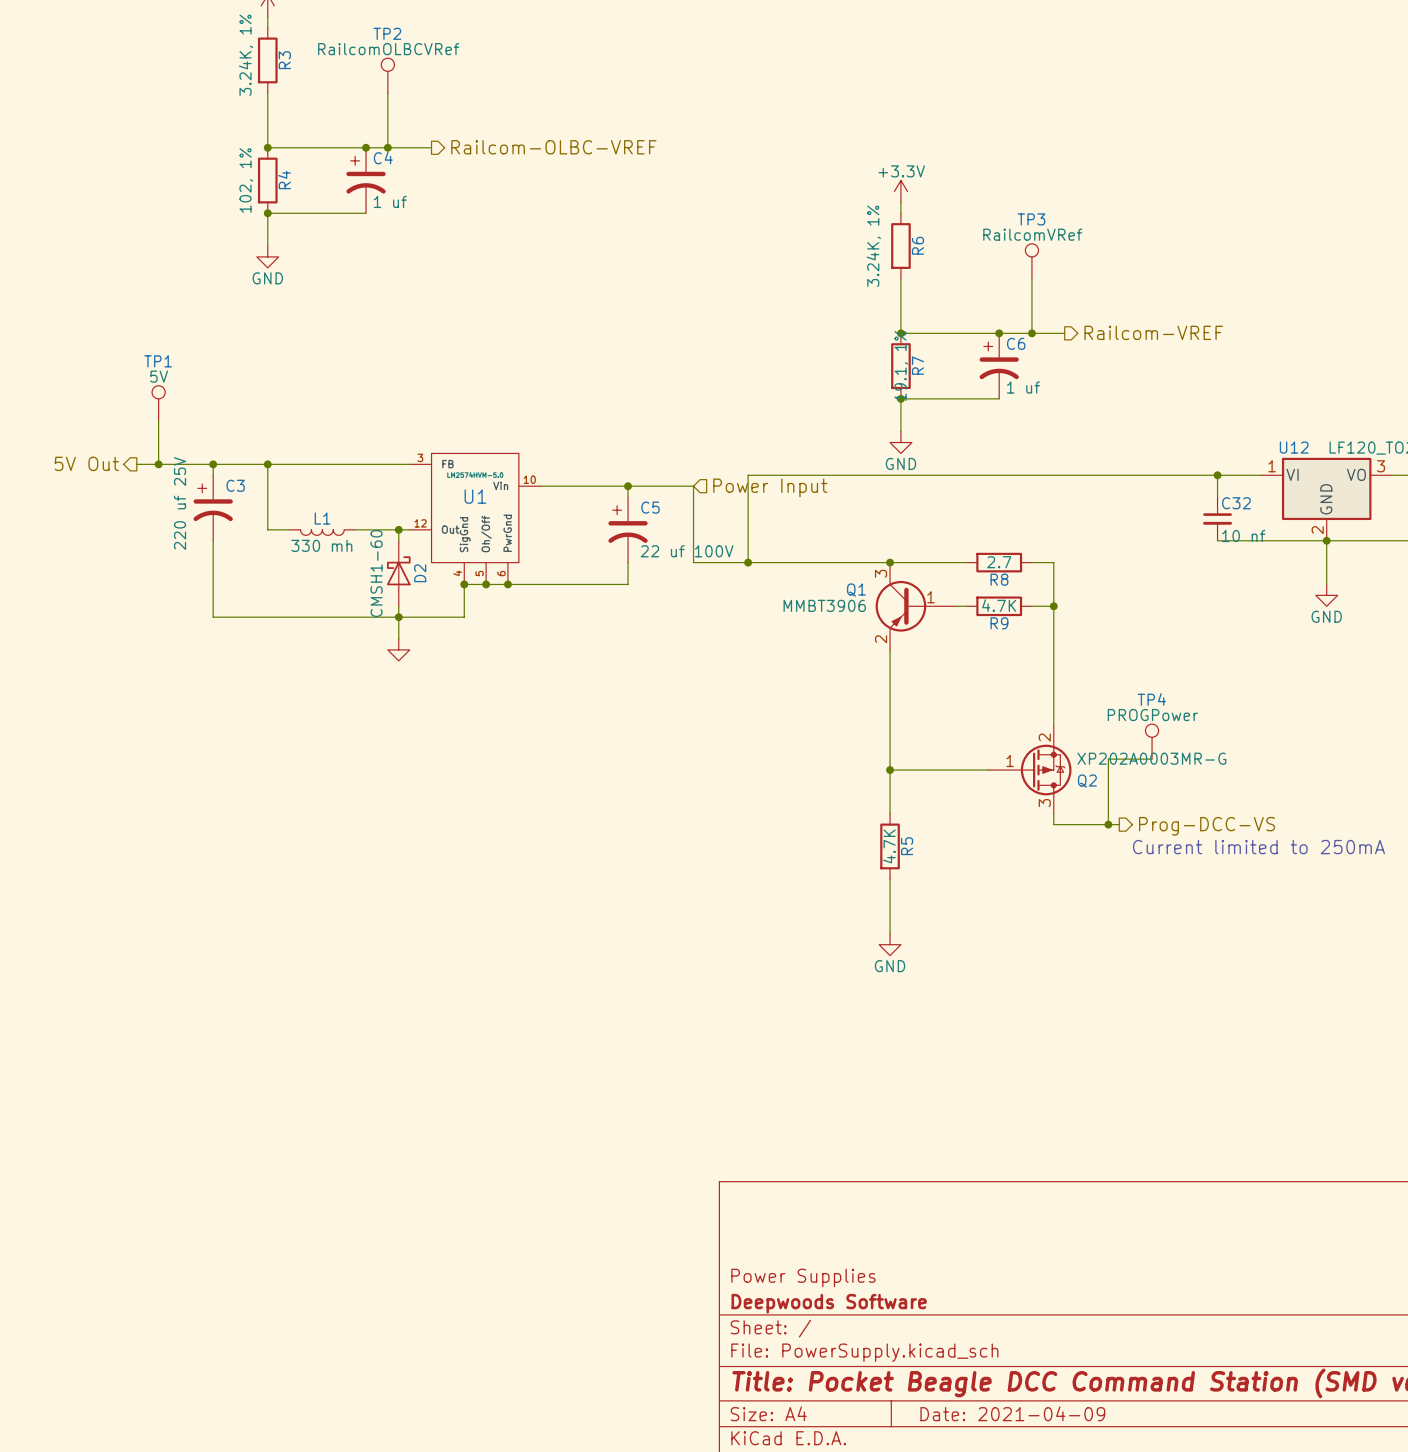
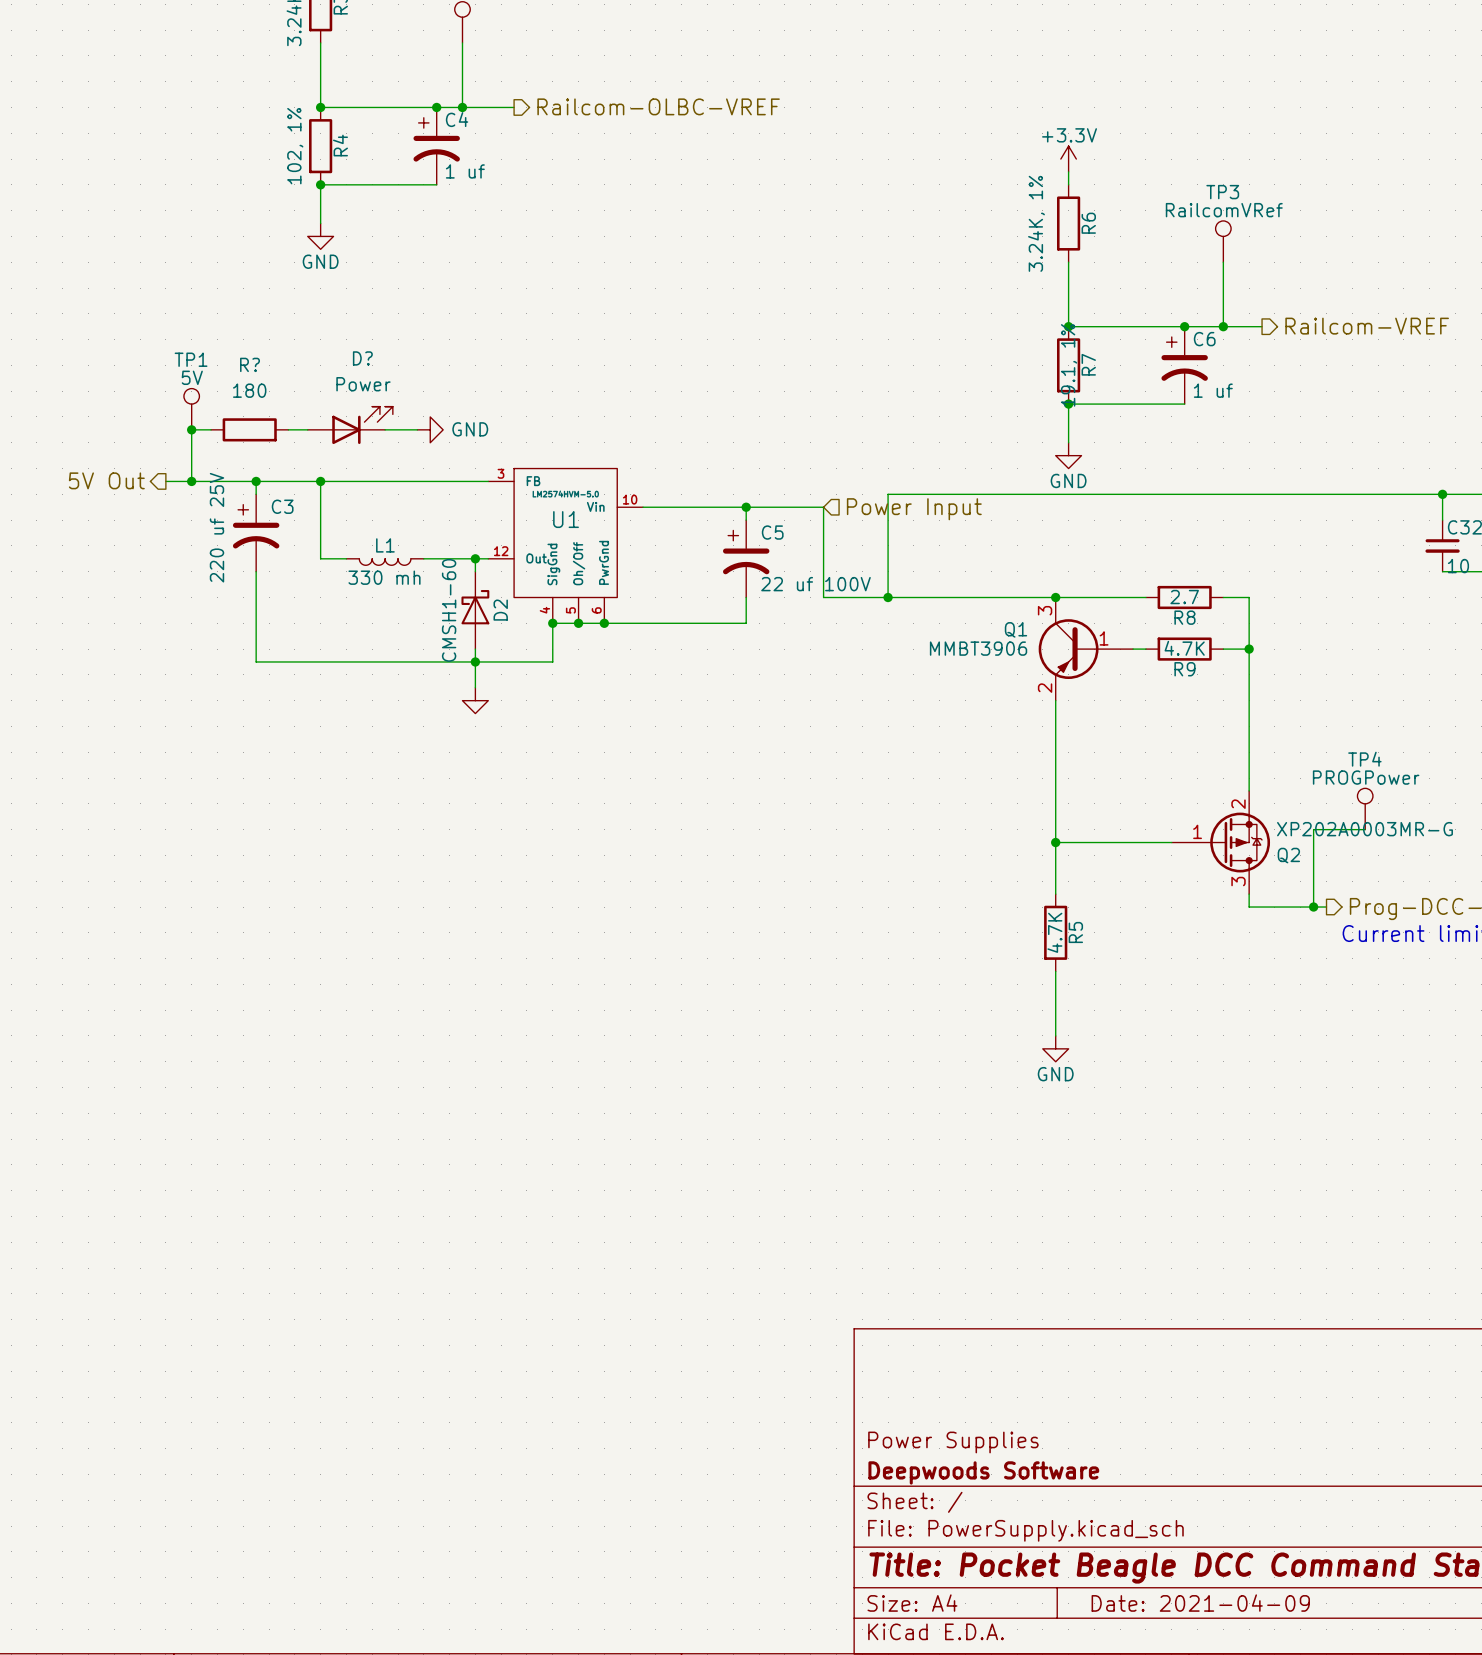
D?: none -> Power (350, 425)
wire: none -> (191, 429) (211, 429)
junction: none -> (191, 429)
R?: none -> 180 (249, 429)
wire: none -> (288, 429) (307, 429)
wire: none -> (385, 429) (417, 429)
power symbol: none -> GND (430, 429)

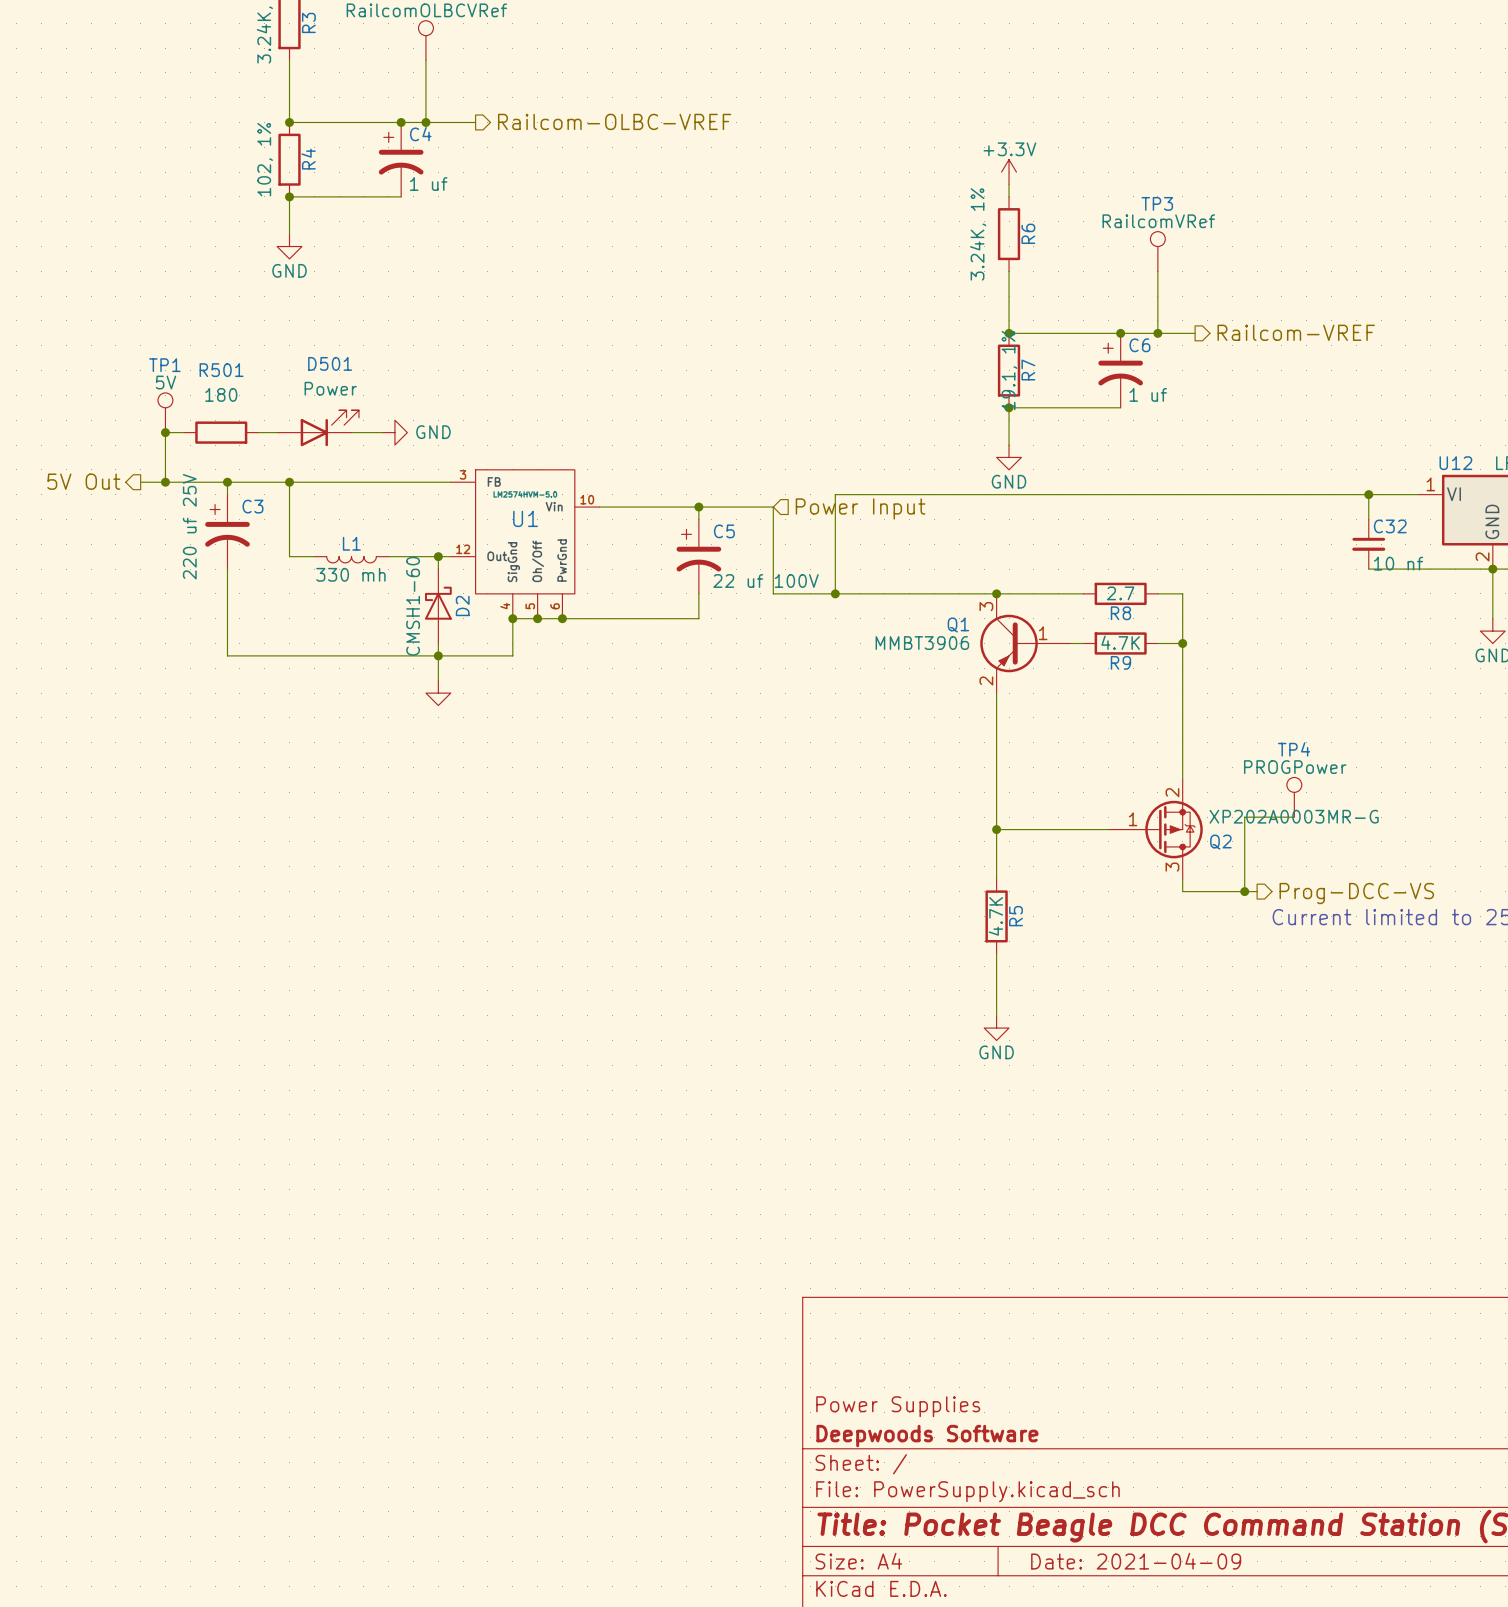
D? name: D? (362, 358) -> D501 (330, 363)
R? name: R? (250, 364) -> R501 (221, 370)

